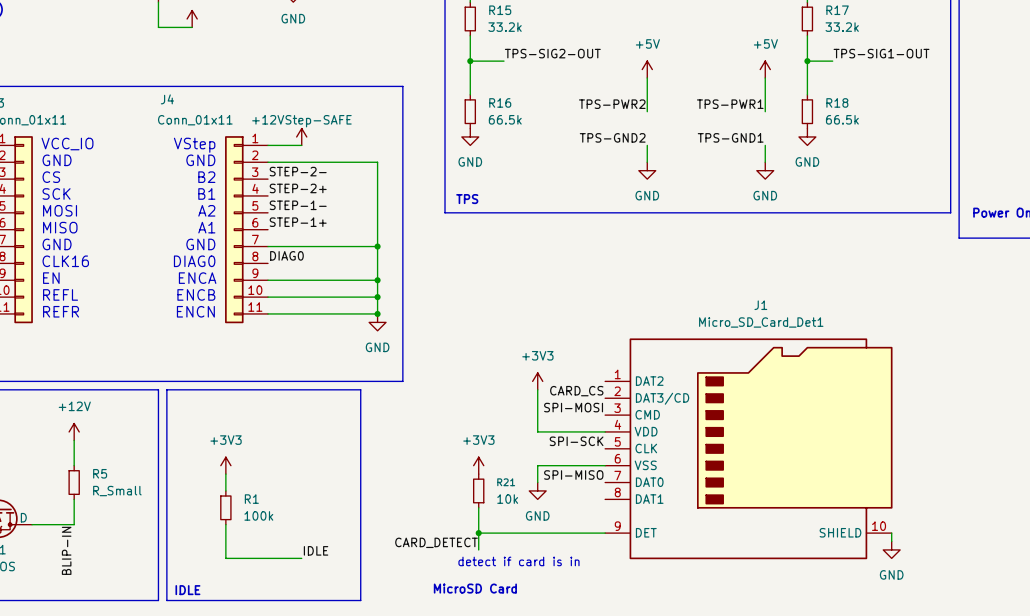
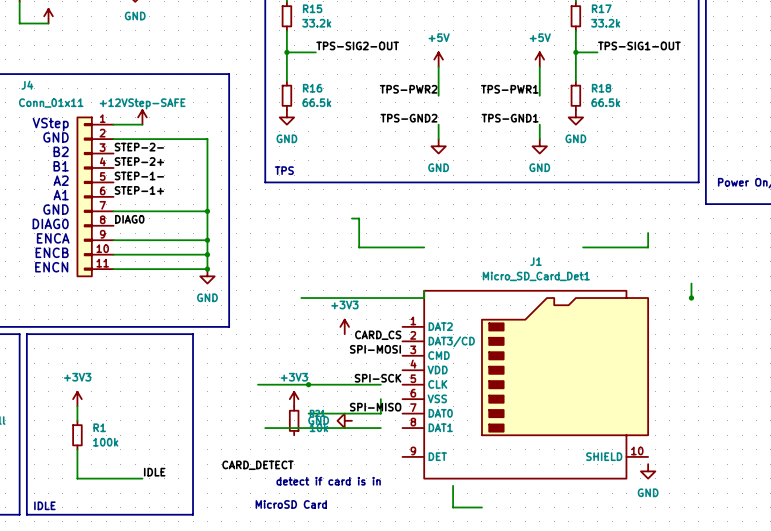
wire: none -> (351, 218) (359, 218) (359, 247) (424, 247)
wire: none -> (648, 233) (648, 247) (583, 247)
wire: none -> (691, 283) (691, 298)
wire: none -> (424, 290) (424, 298) (301, 298)
junction: none -> (691, 298)
wire: (537, 389) (537, 431) (605, 431) -> none
wire: none -> (258, 384) (380, 384)
junction: none -> (308, 384)
wire: none -> (380, 399) (380, 413) (308, 413)
wire: (605, 465) (537, 465) (537, 482) -> none
power symbol rotation: 0° (537, 490) -> 90° clockwise (344, 420)
wire: none -> (265, 428) (380, 428)
wire: (478, 507) (478, 549) -> none
wire: (478, 533) (605, 533) -> none
junction: (478, 533) -> none
wire: (891, 533) (891, 541) -> none
wire: none -> (453, 485) (453, 507) (481, 507)

